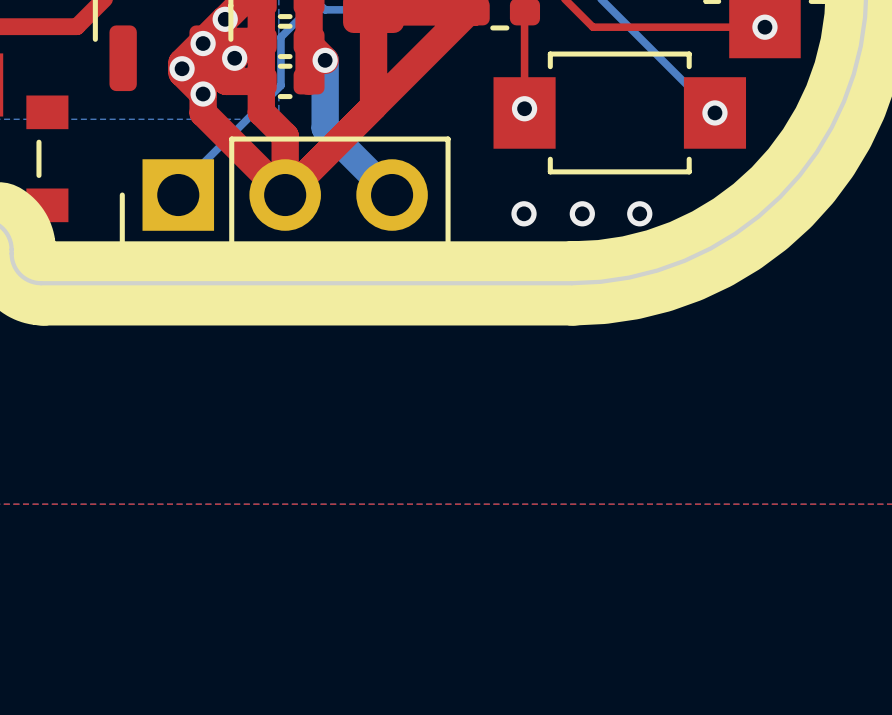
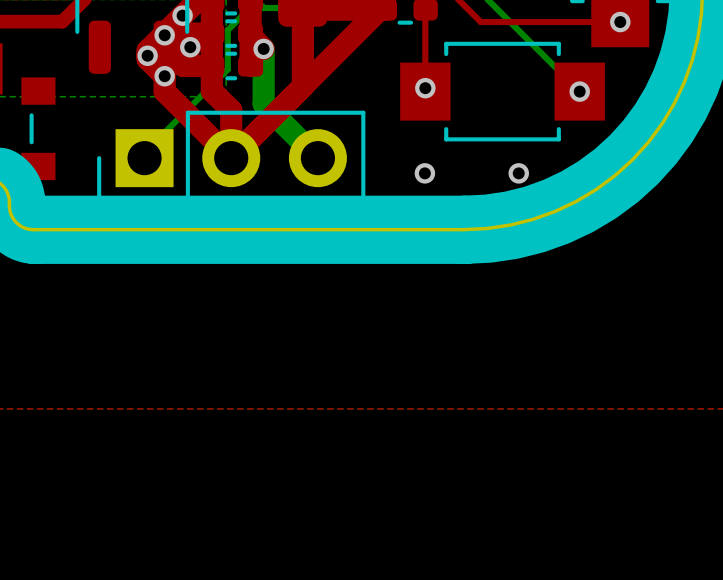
via: (582, 213) -> none

